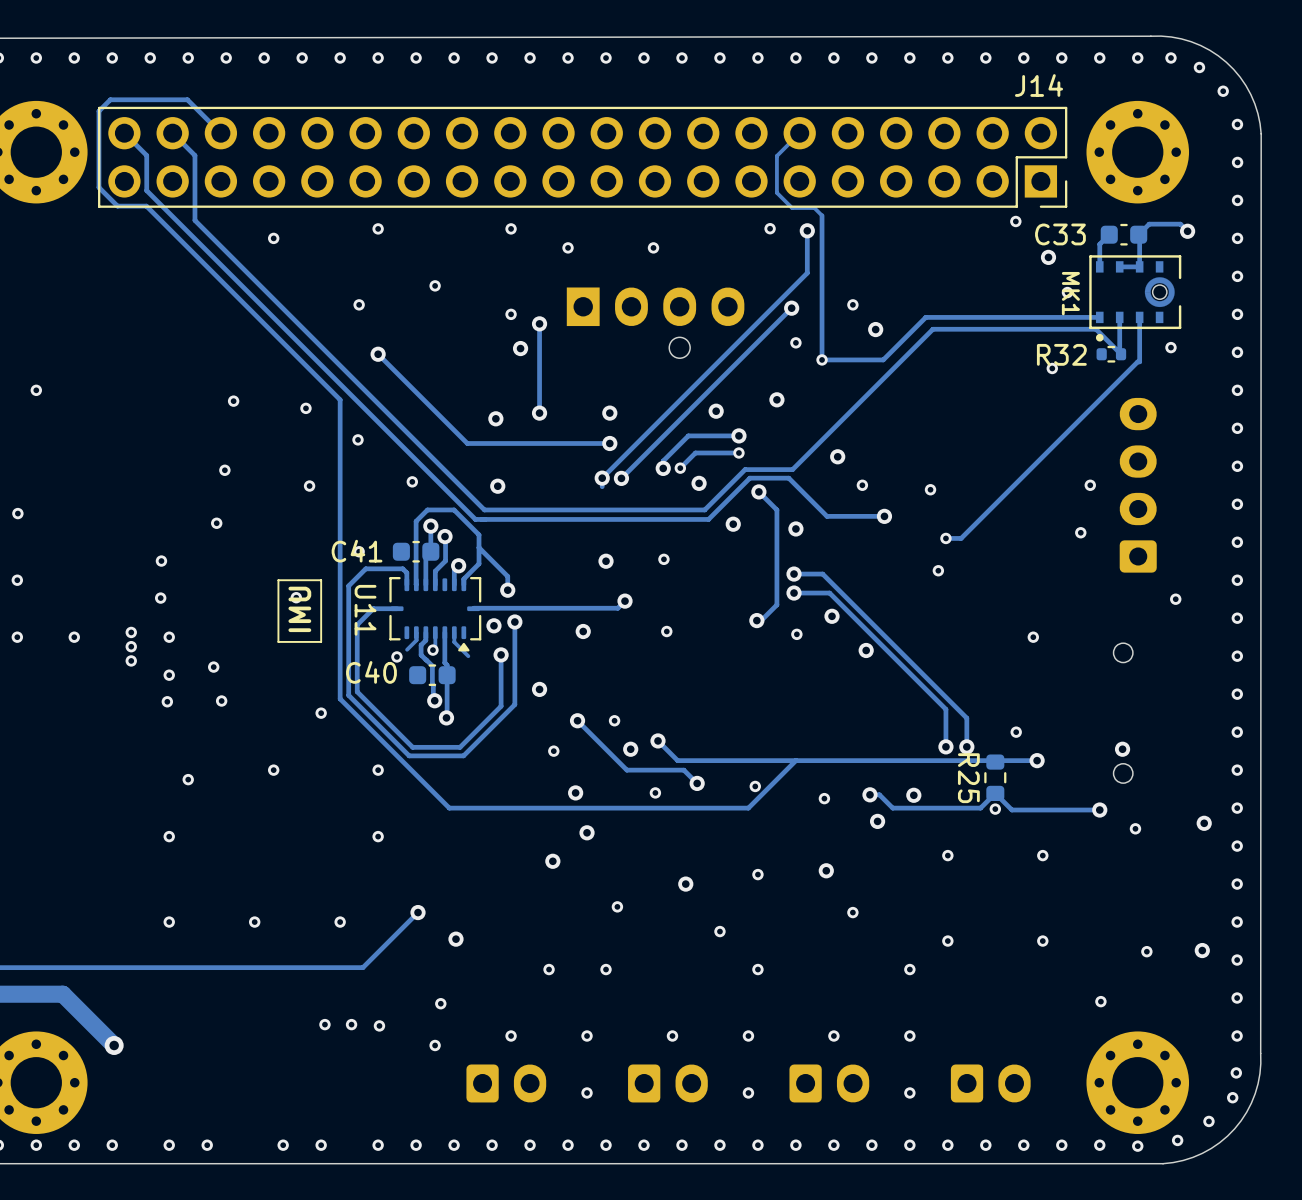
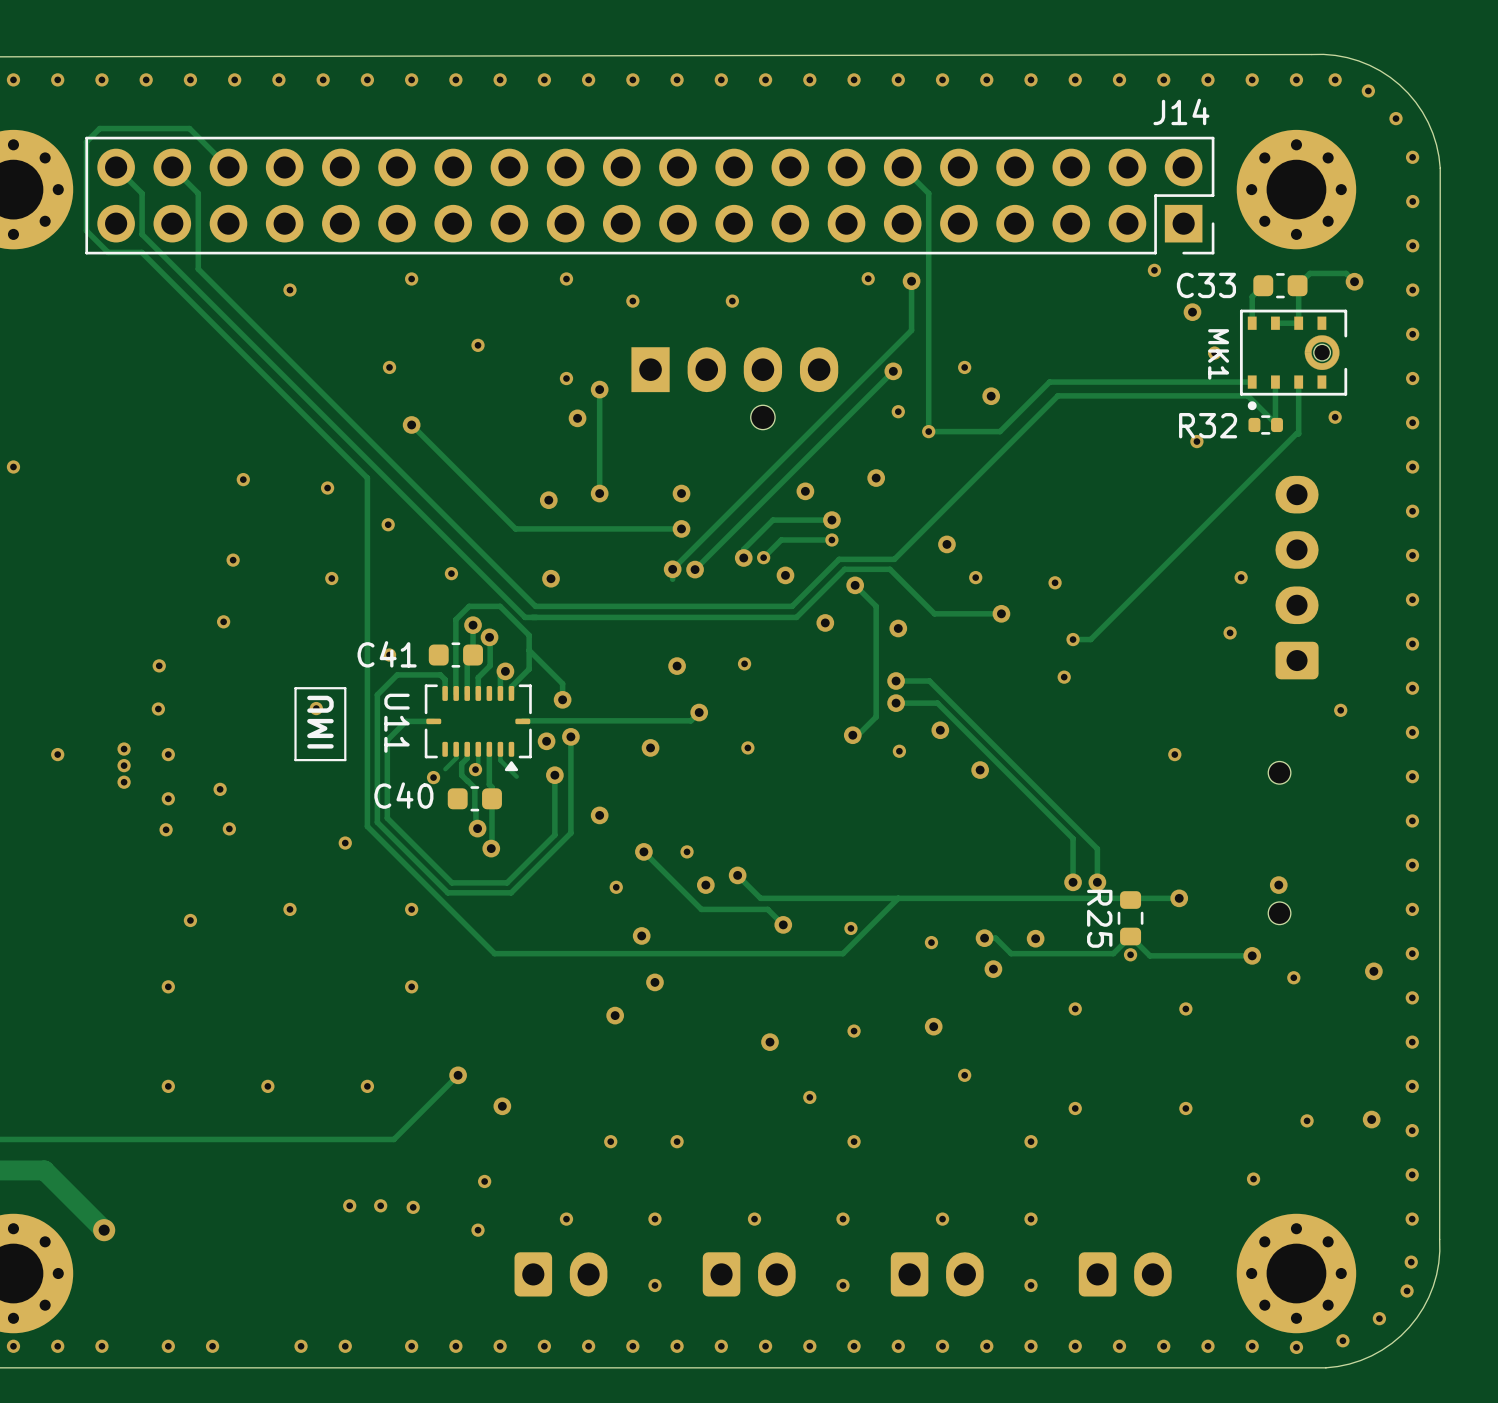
track: (799, 133) (776, 155) (776, 192) (792, 208) (814, 208) (822, 215) -> (902, 167) (928, 193) (928, 263)
via: (1016, 732) -> none
via: (655, 792) -> none
via: (617, 906) -> none

